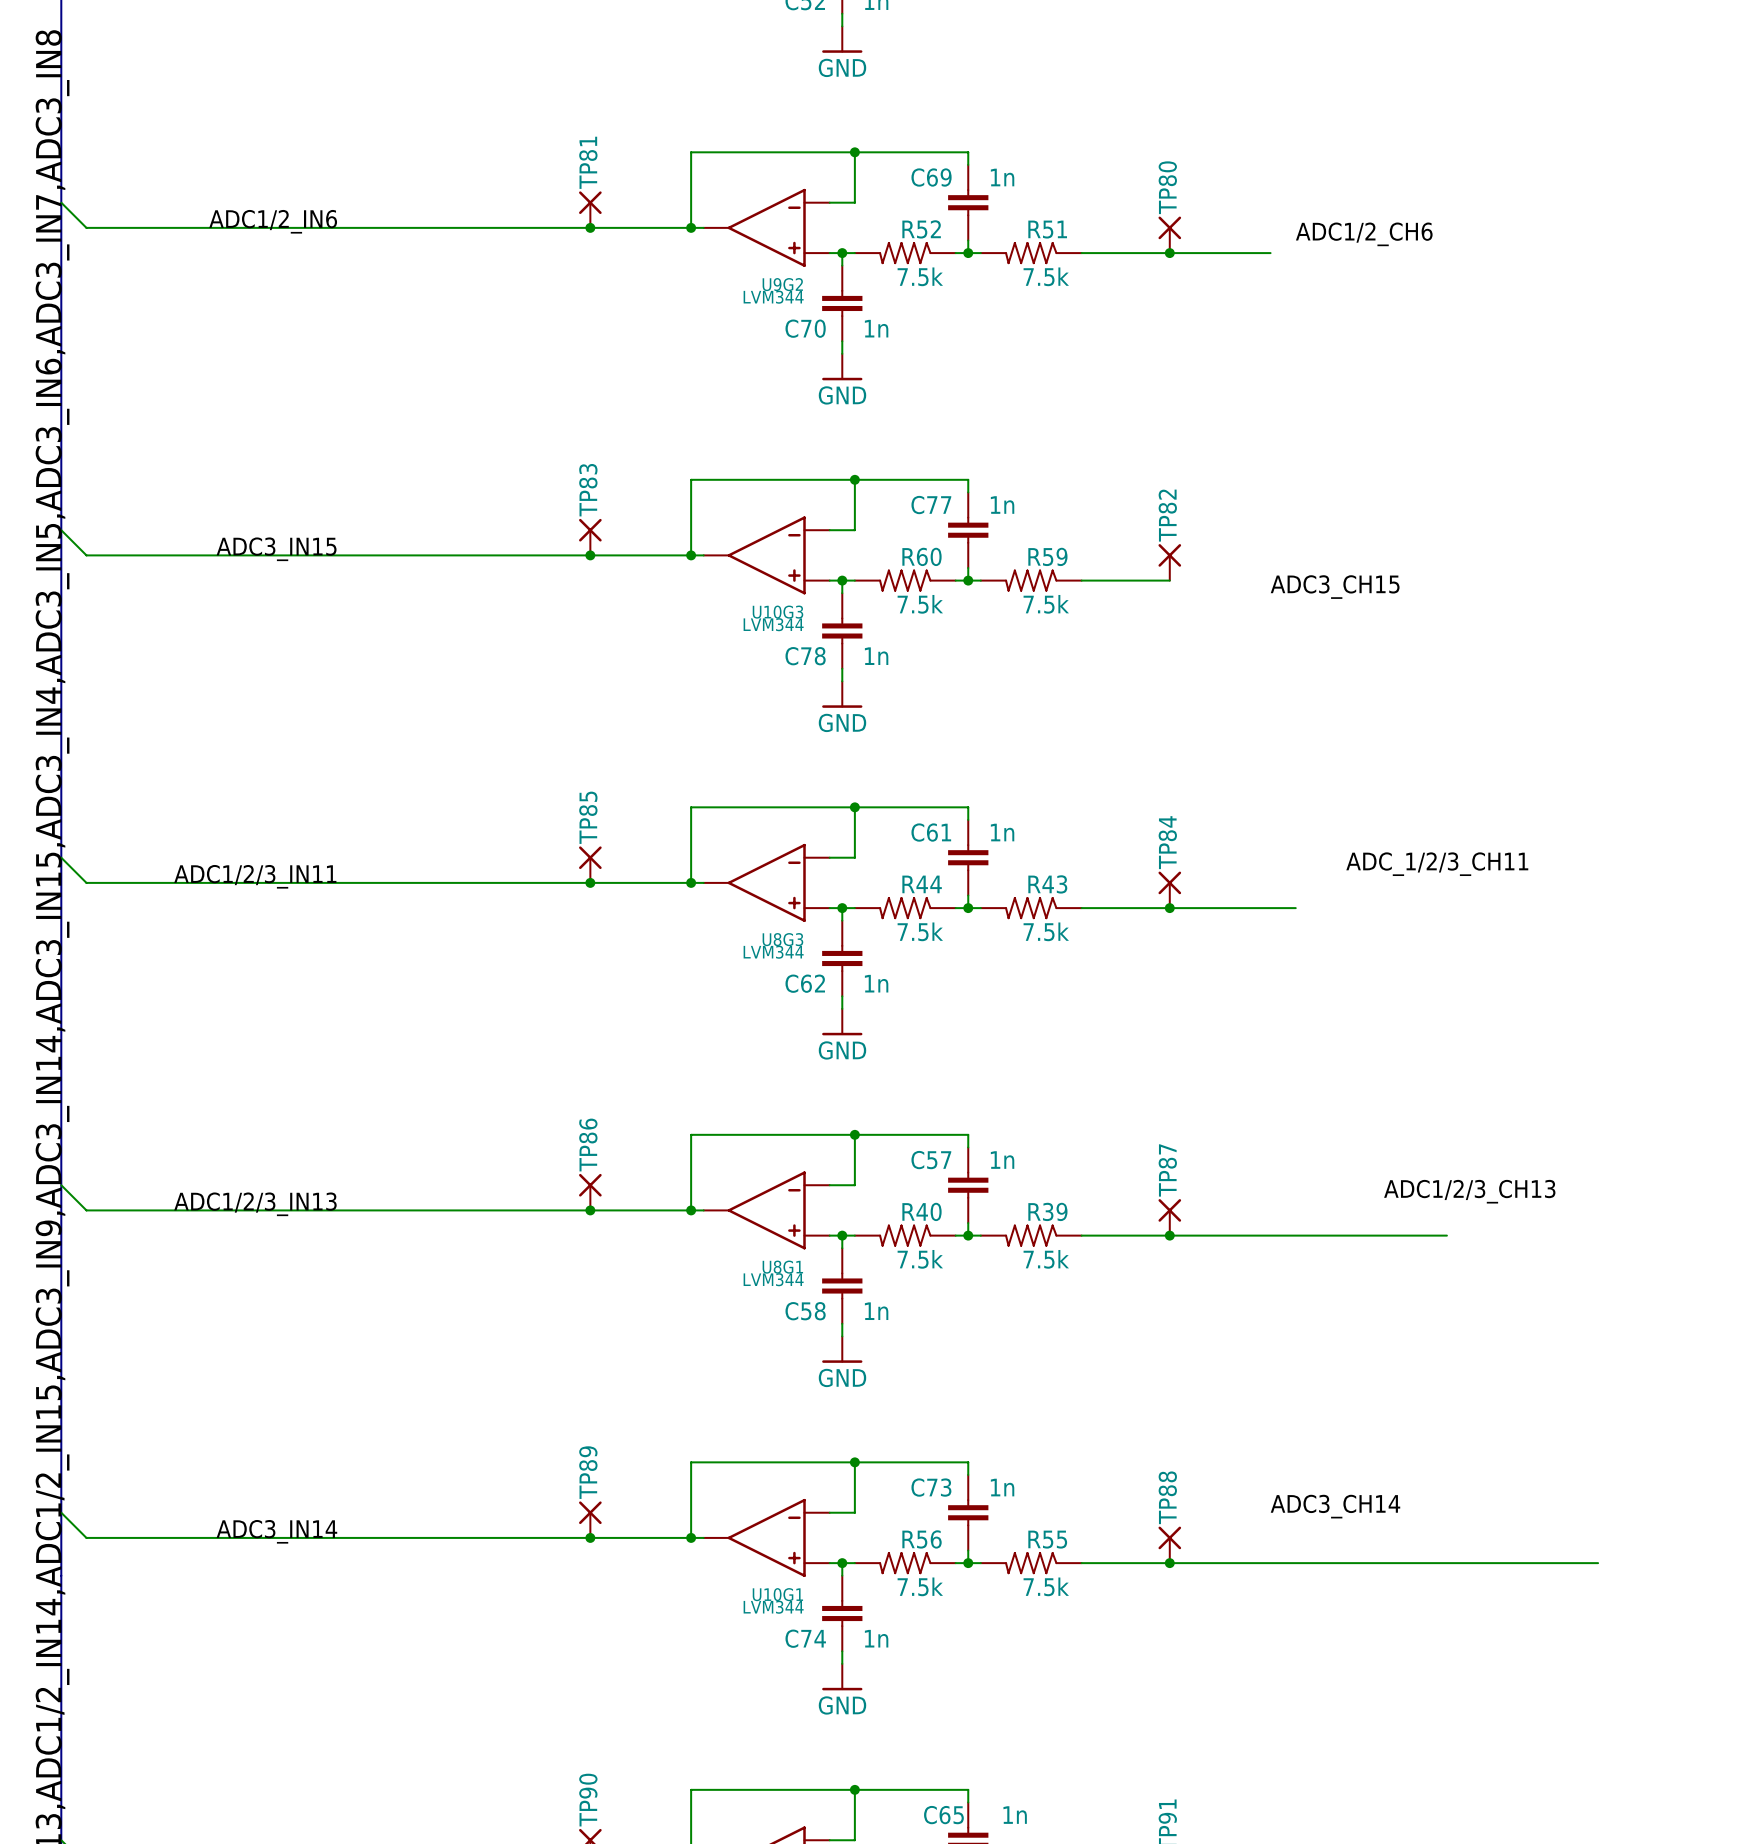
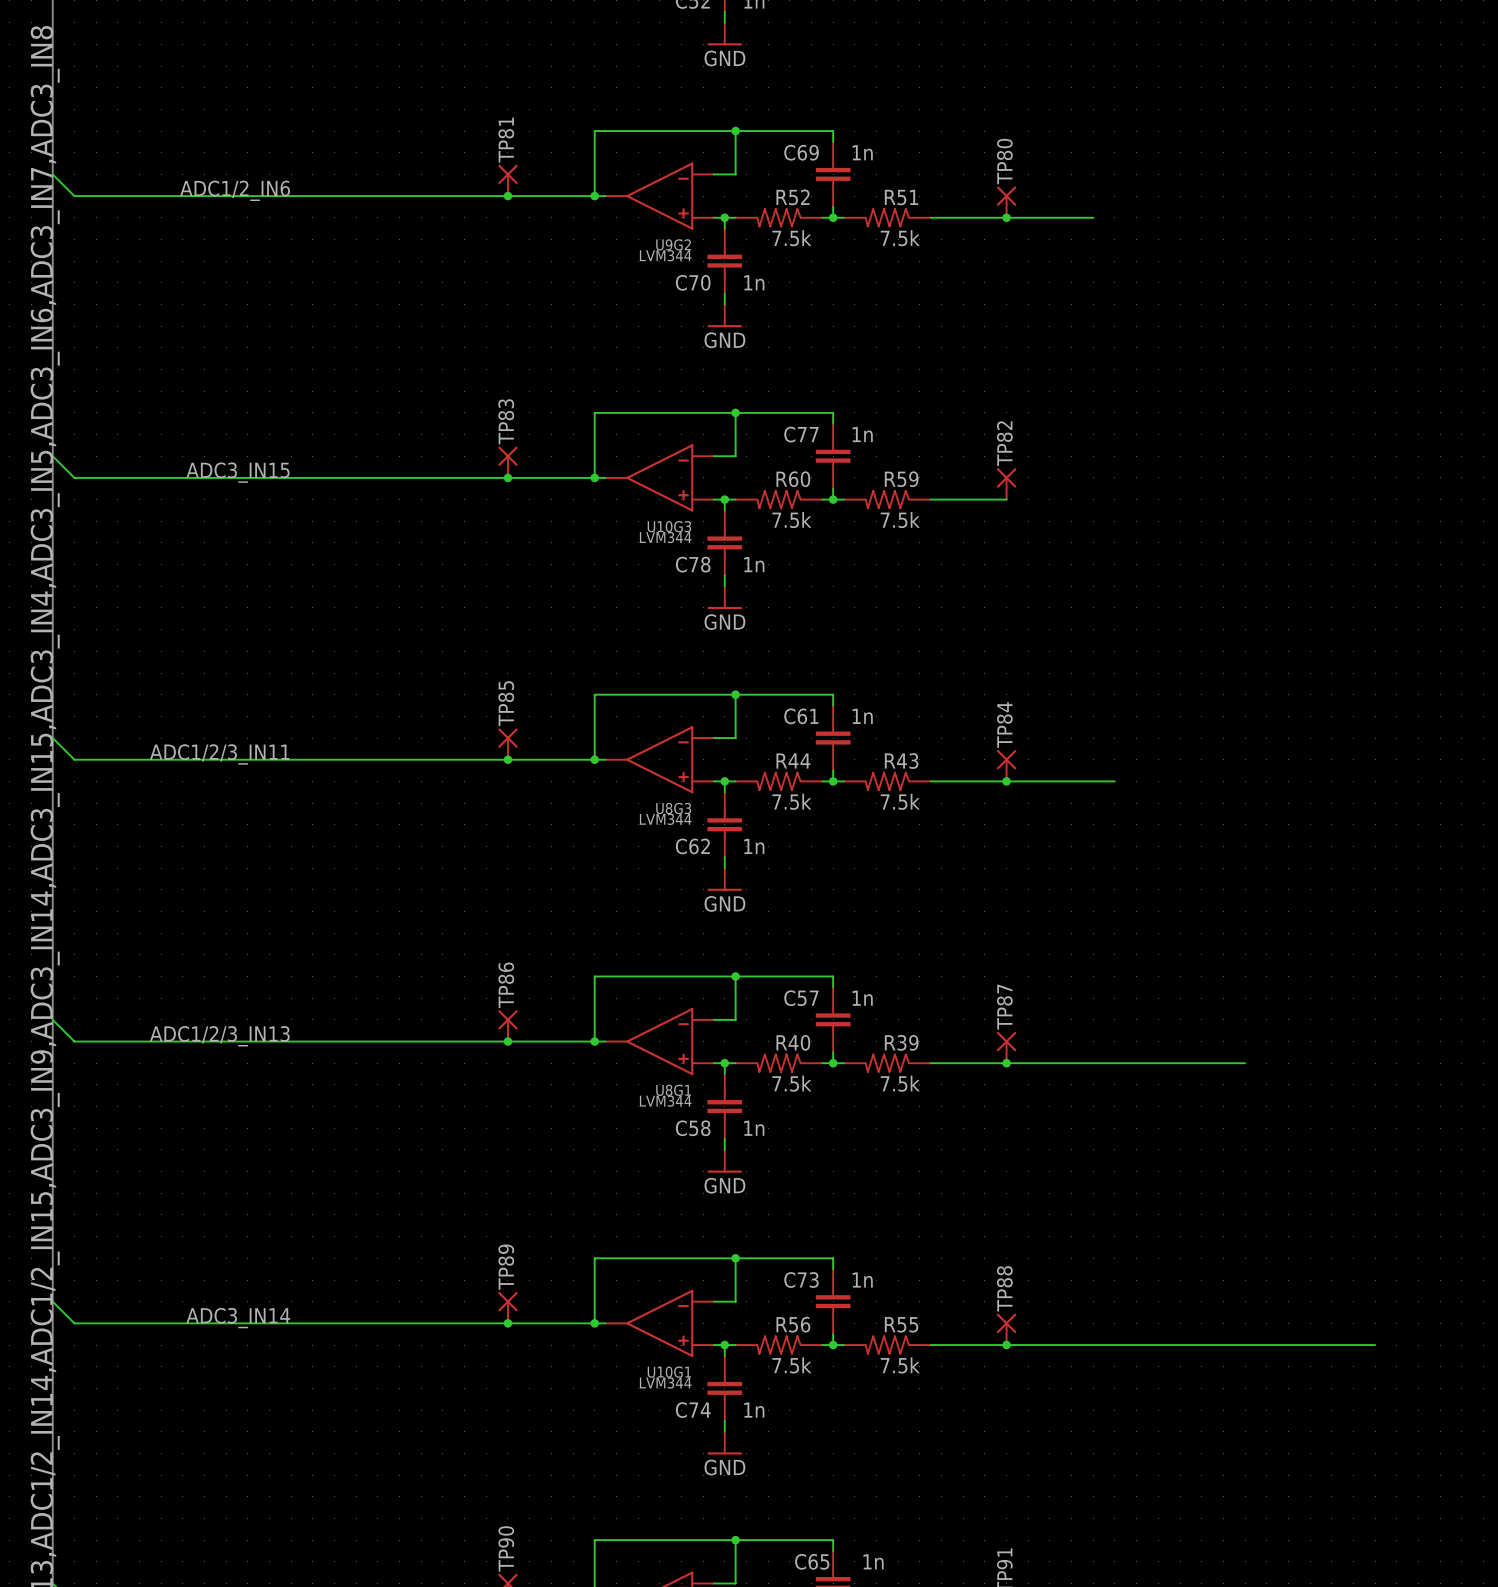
label: ADC1/2_CH6 (1364, 234) -> none
label: ADC3_CH15 (1335, 587) -> none
label: ADC_1/2/3_CH11 (1437, 864) -> none
label: ADC1/2/3_CH13 (1469, 1191) -> none
label: ADC3_CH14 (1335, 1506) -> none

